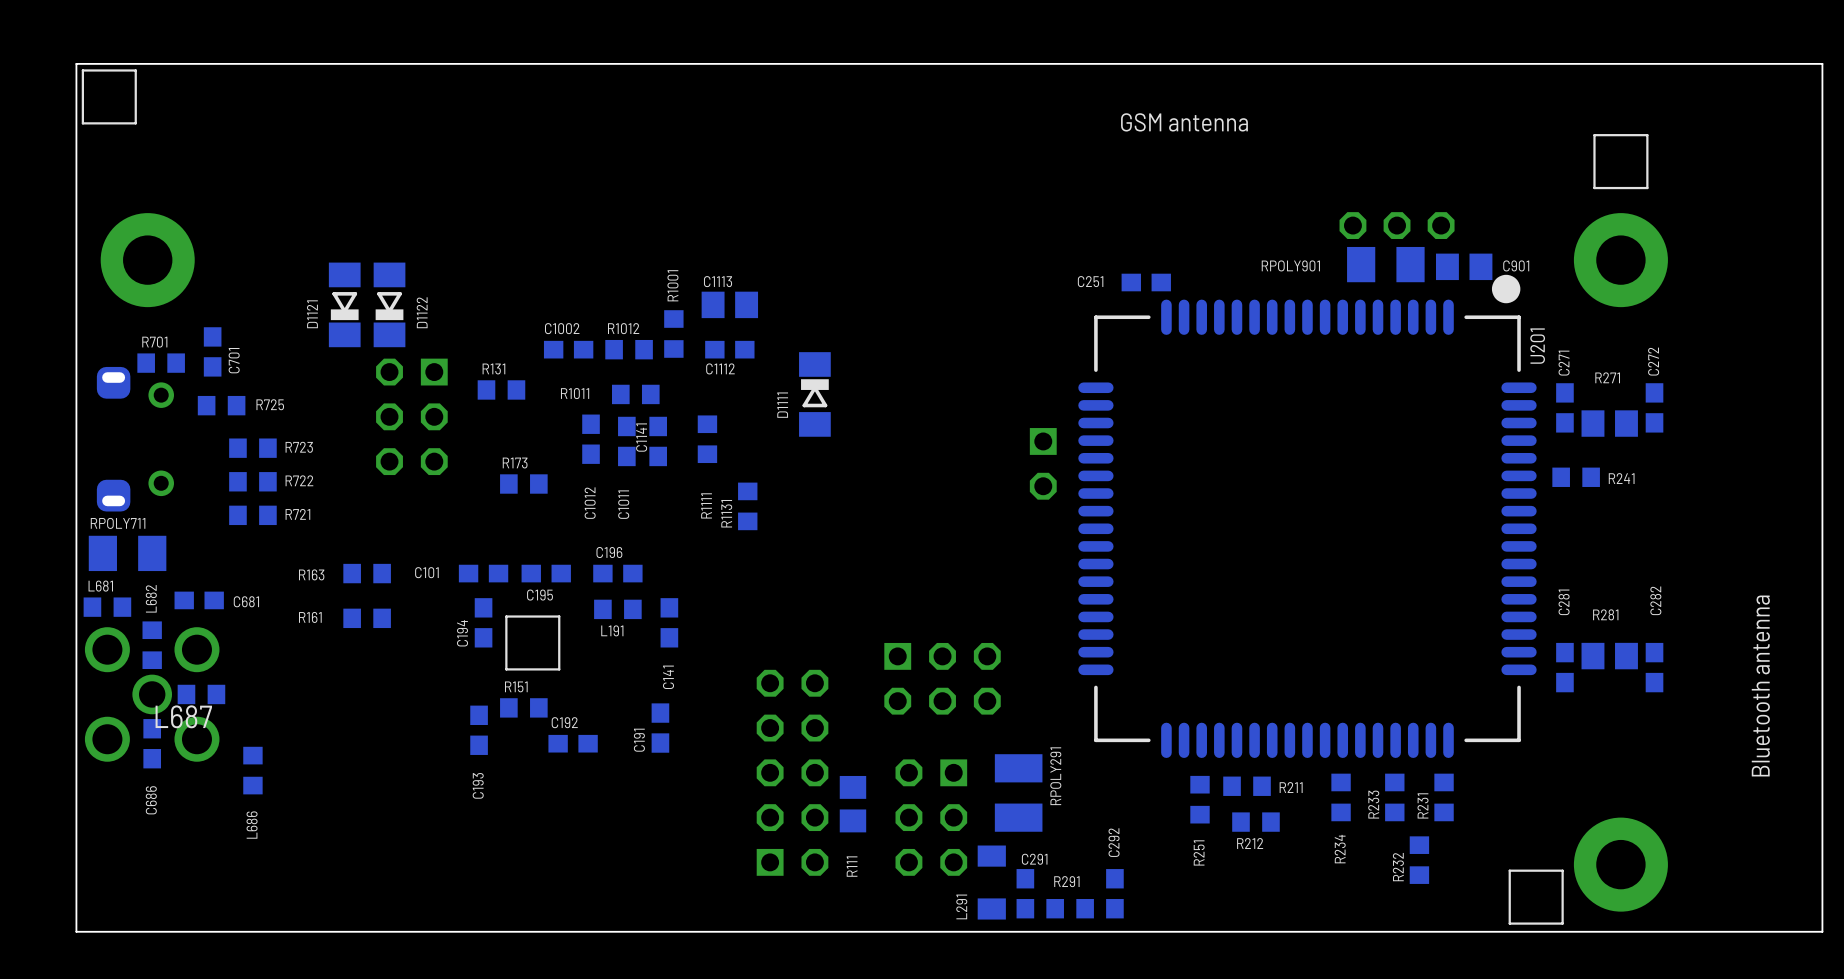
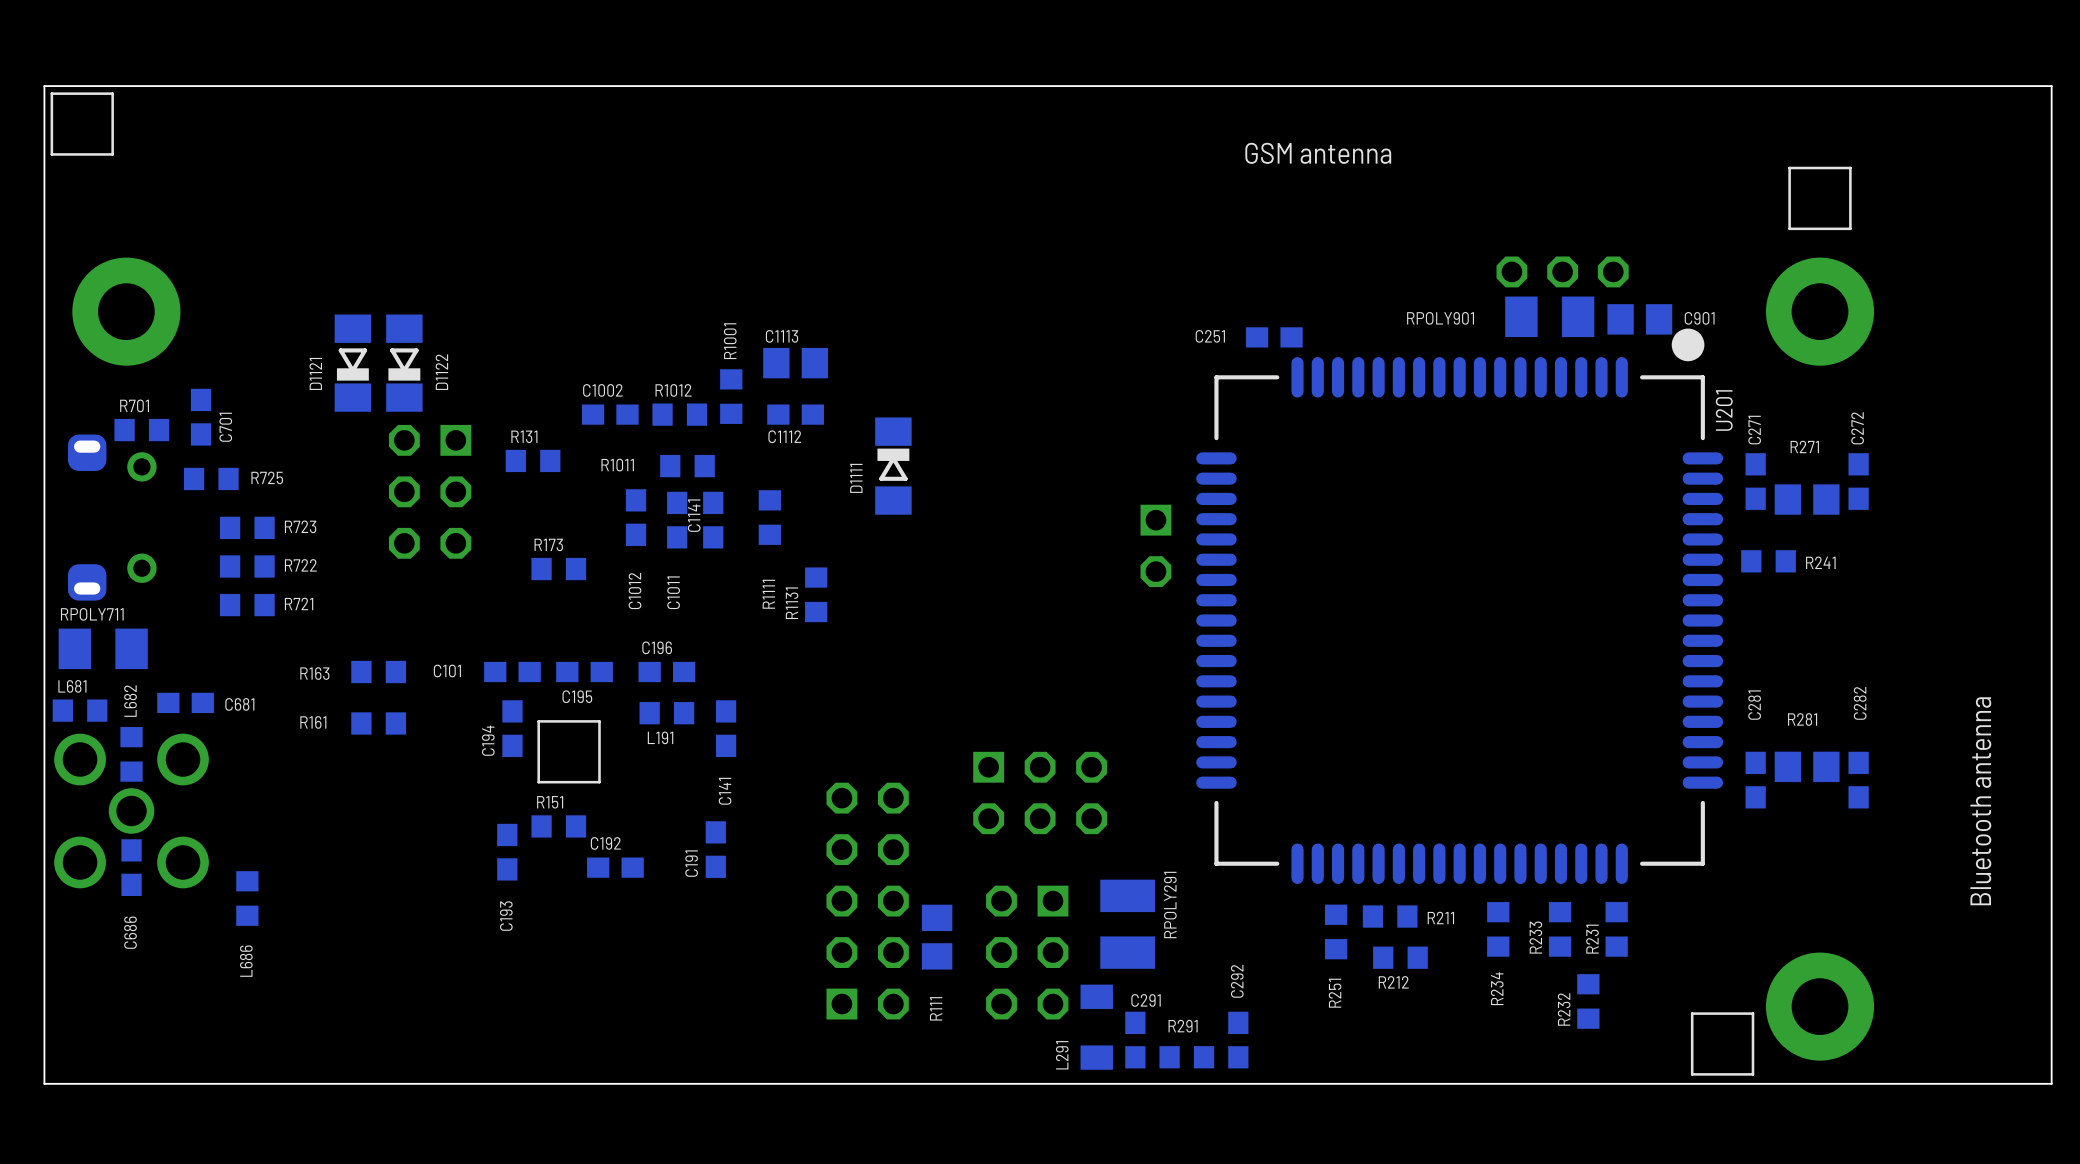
L687: (201, 694) -> none

